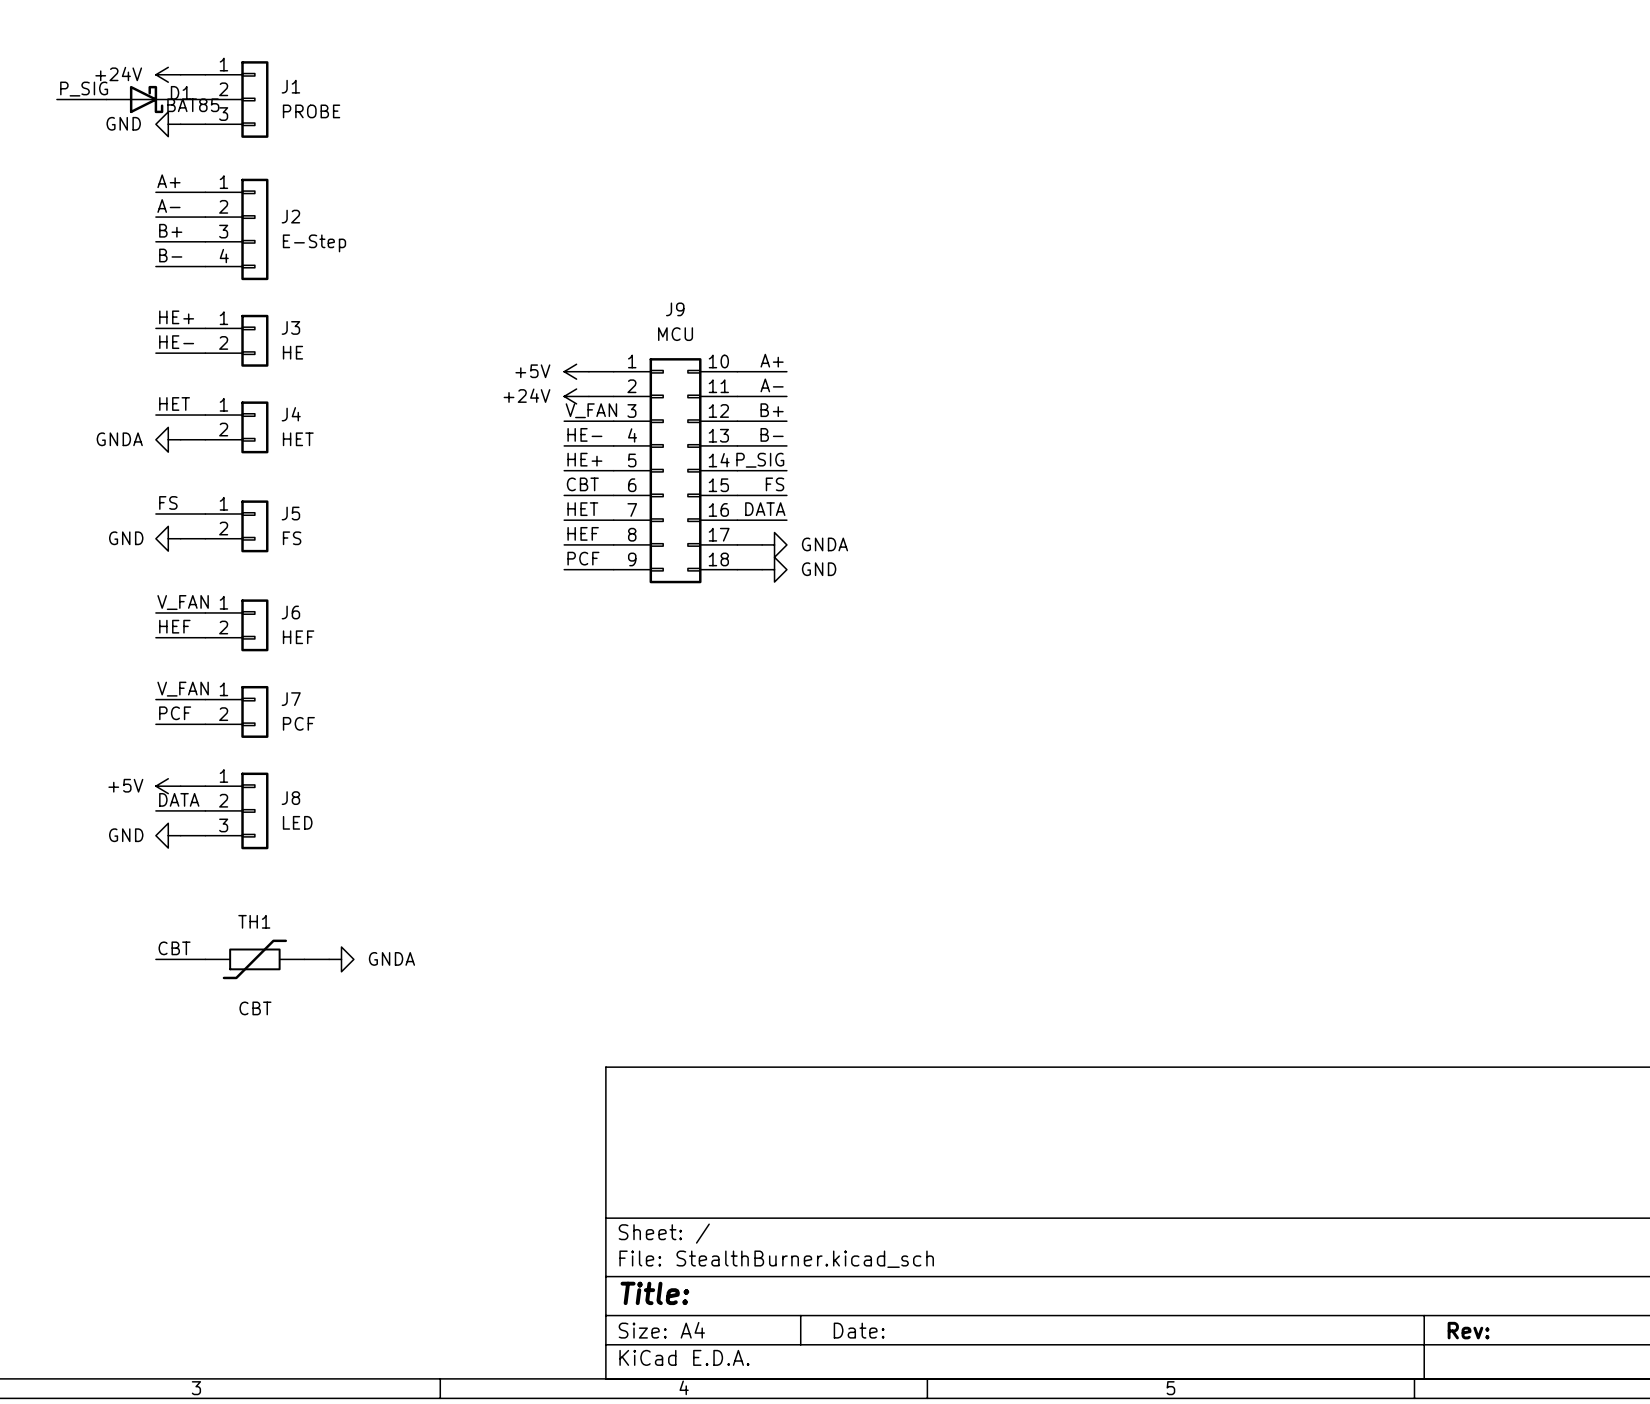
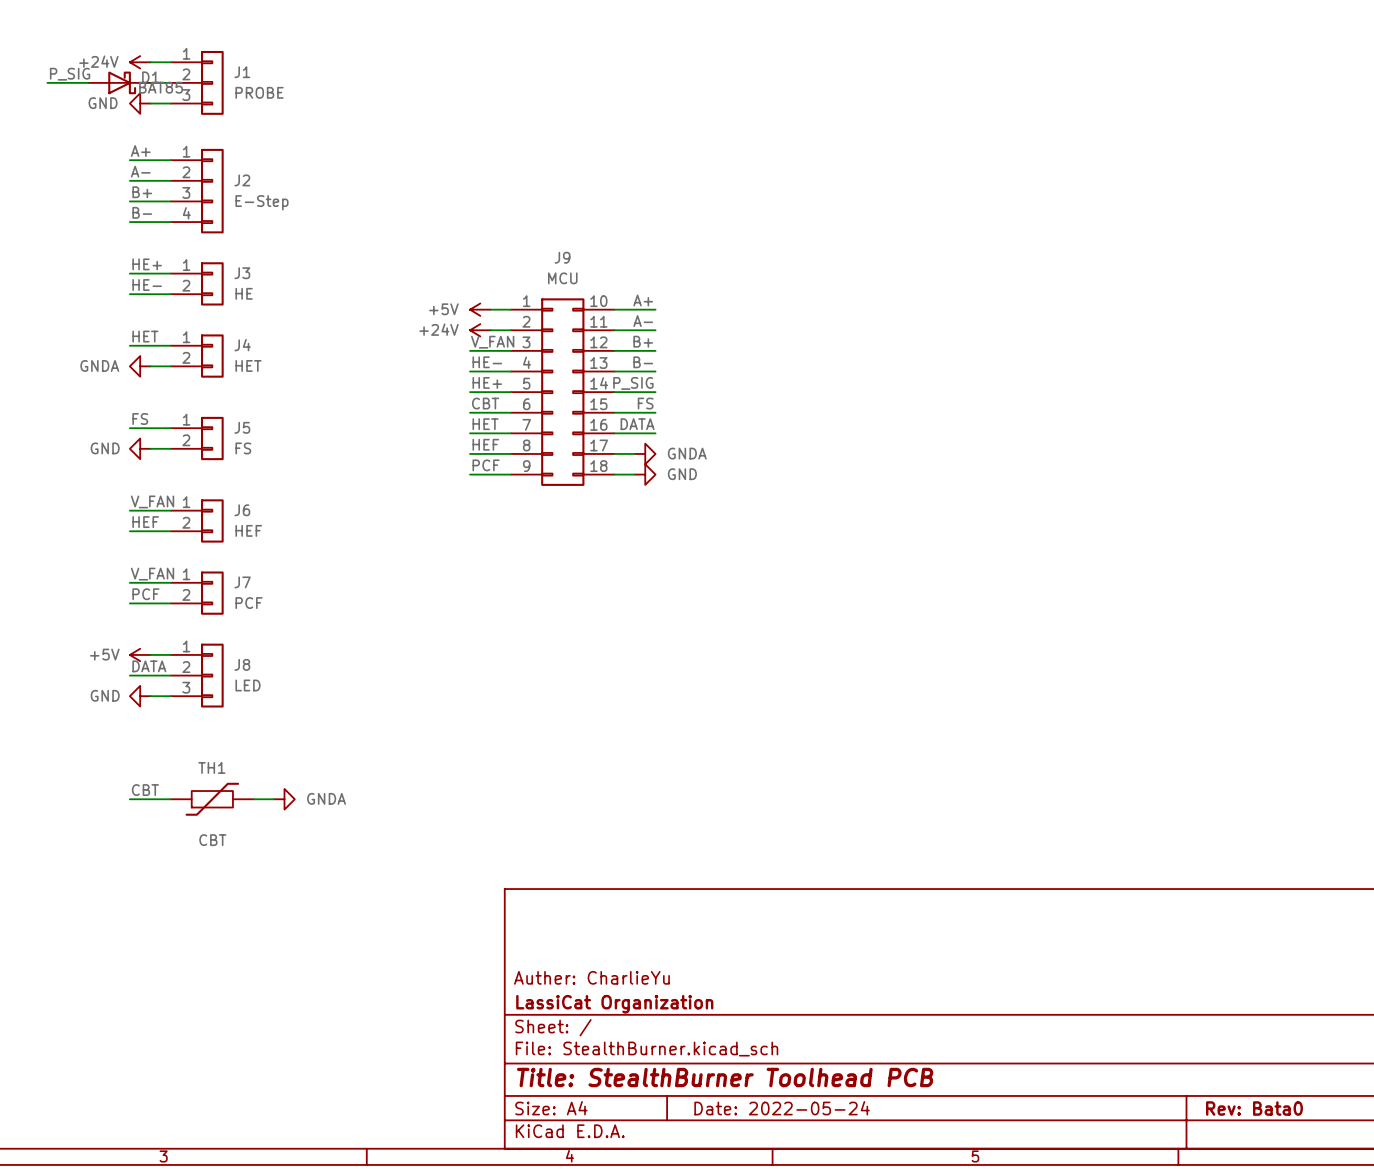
title block: none -> Auther: CharlieYu (591, 977)
title block: none -> LassiCat Organization (614, 1004)
title block: Title: (654, 1293) -> Title: StealthBurner Toolhead PCB (725, 1077)
title block: Date: (859, 1330) -> Date: 2022-05-24 (782, 1108)
title block: Rev: (1468, 1330) -> Rev: Bata0 (1254, 1108)

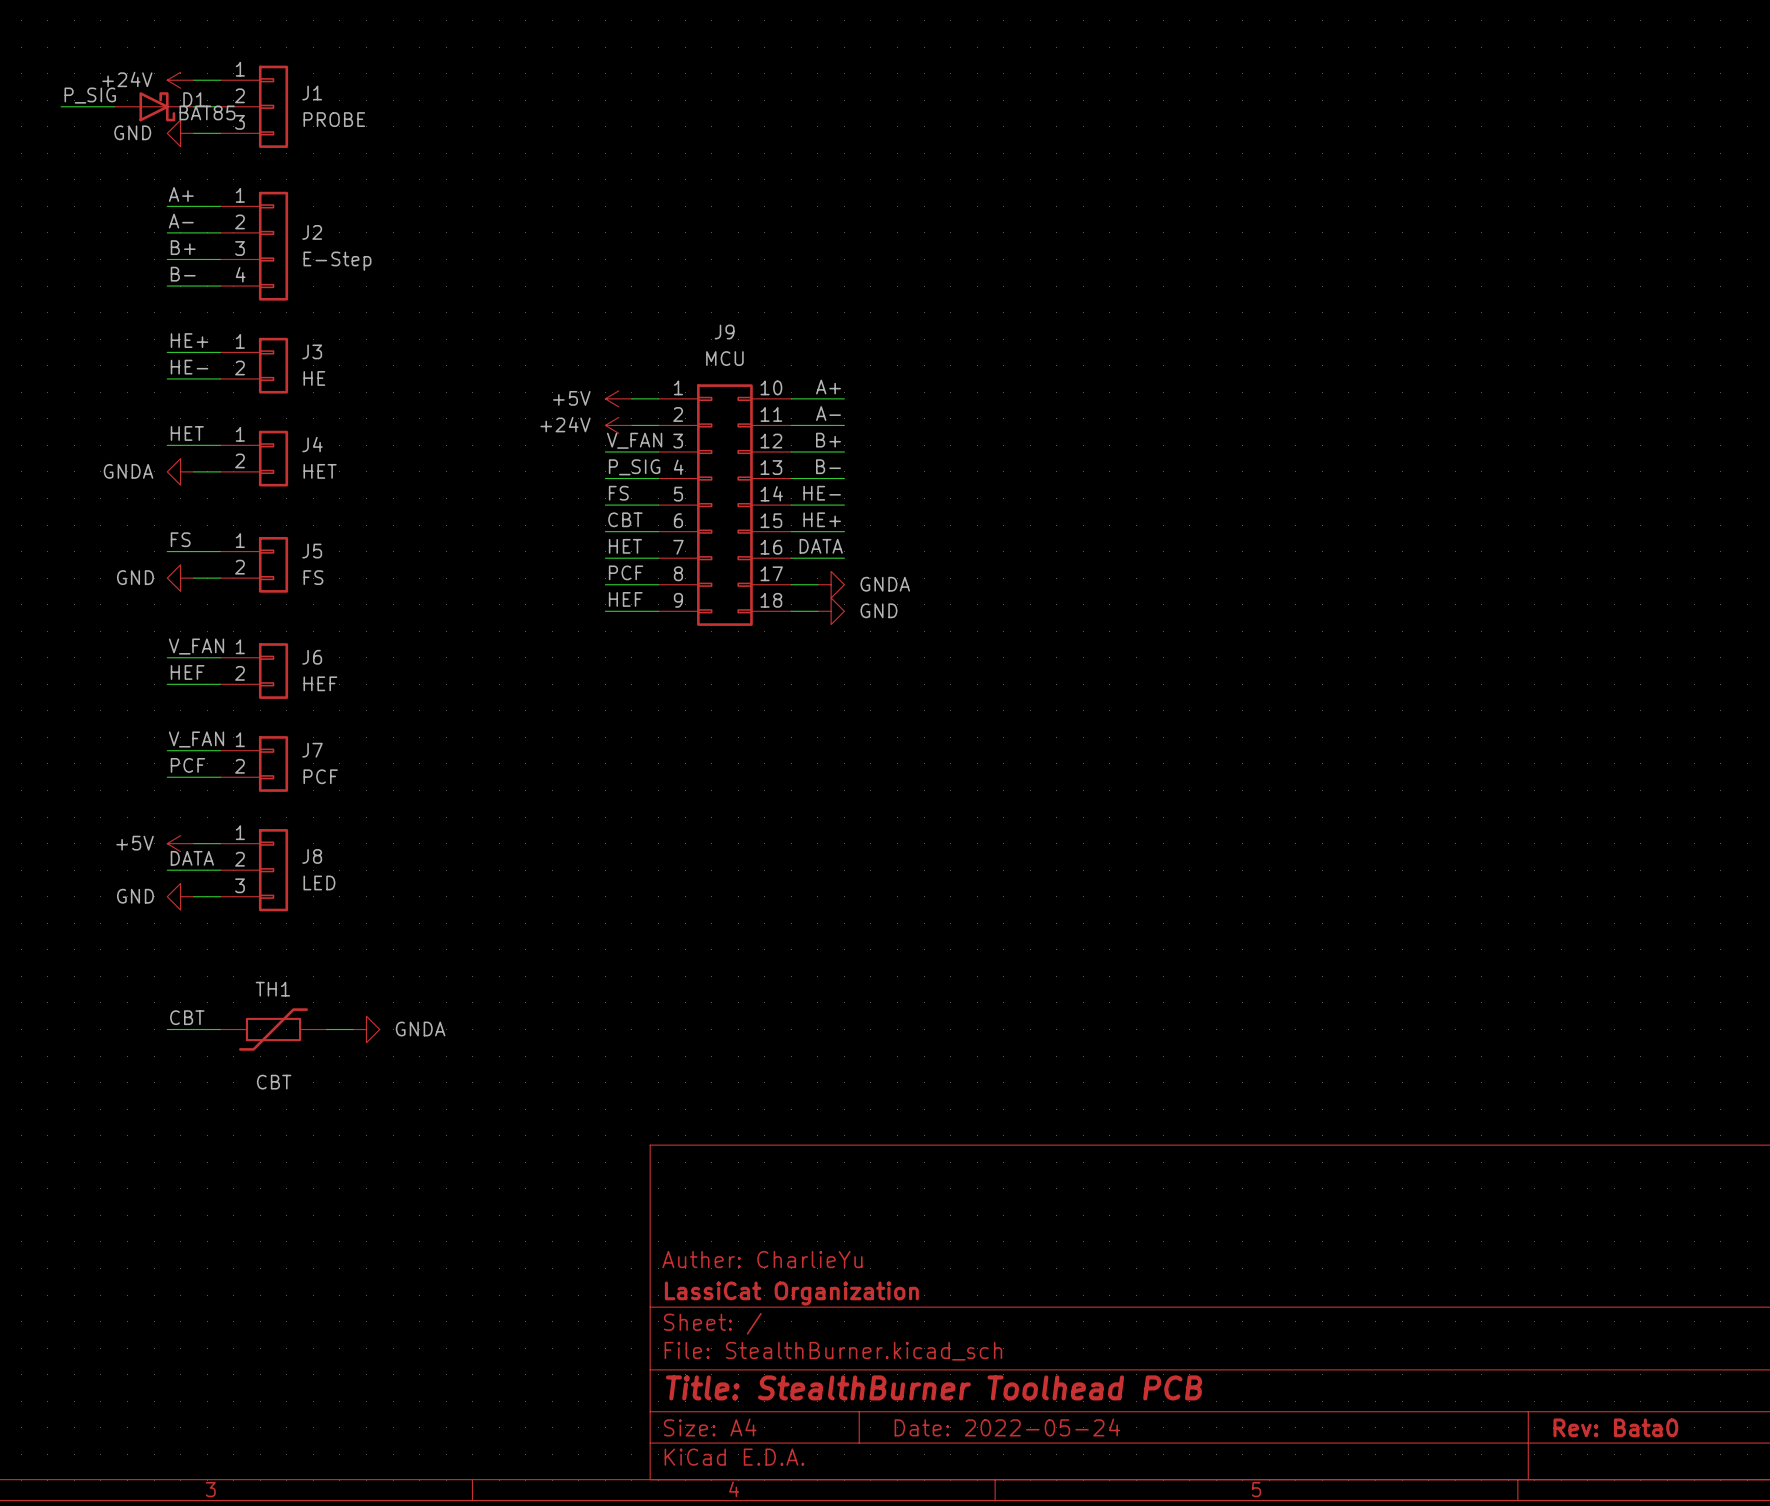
label: HE- (487, 362) -> P_SIG (634, 467)
label: HE+ (487, 382) -> FS (618, 493)
label: P_SIG (633, 383) -> HE- (822, 493)
label: FS (645, 403) -> HE+ (822, 519)
label: HEF (485, 444) -> PCF (626, 572)
label: PCF (486, 465) -> HEF (625, 599)

